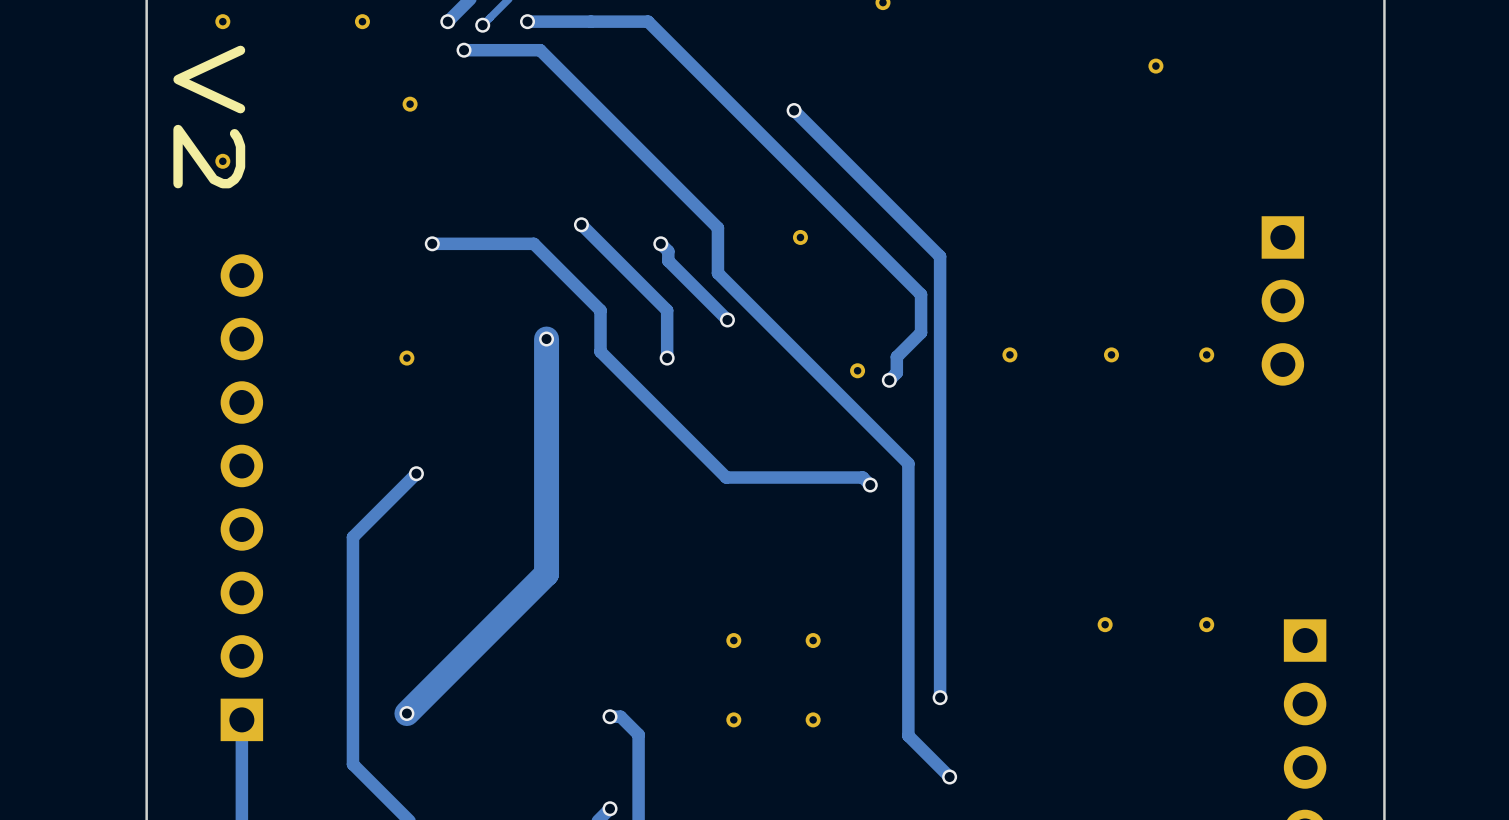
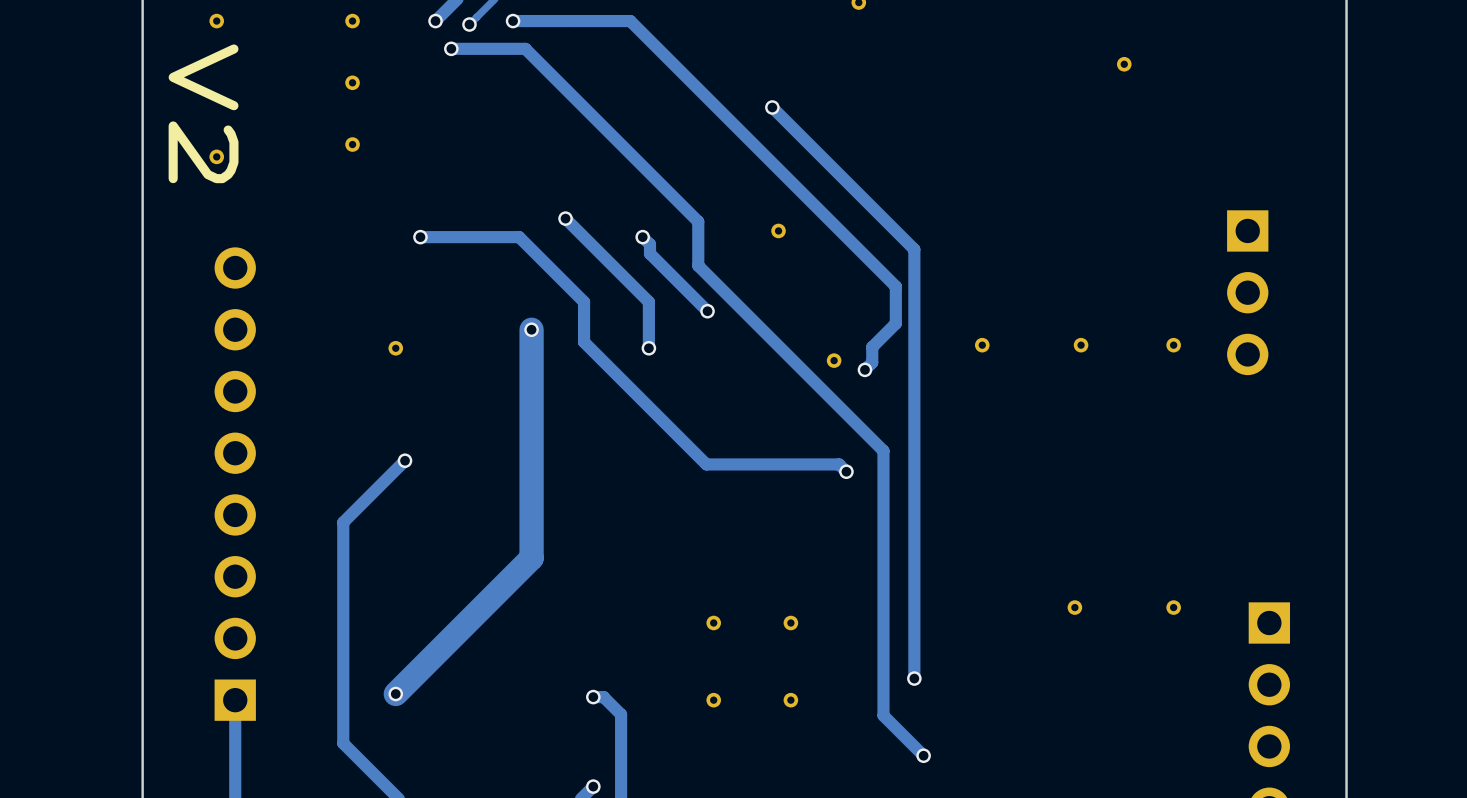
part: none -> (352, 82)
part: (410, 104) -> none
part: none -> (352, 144)

